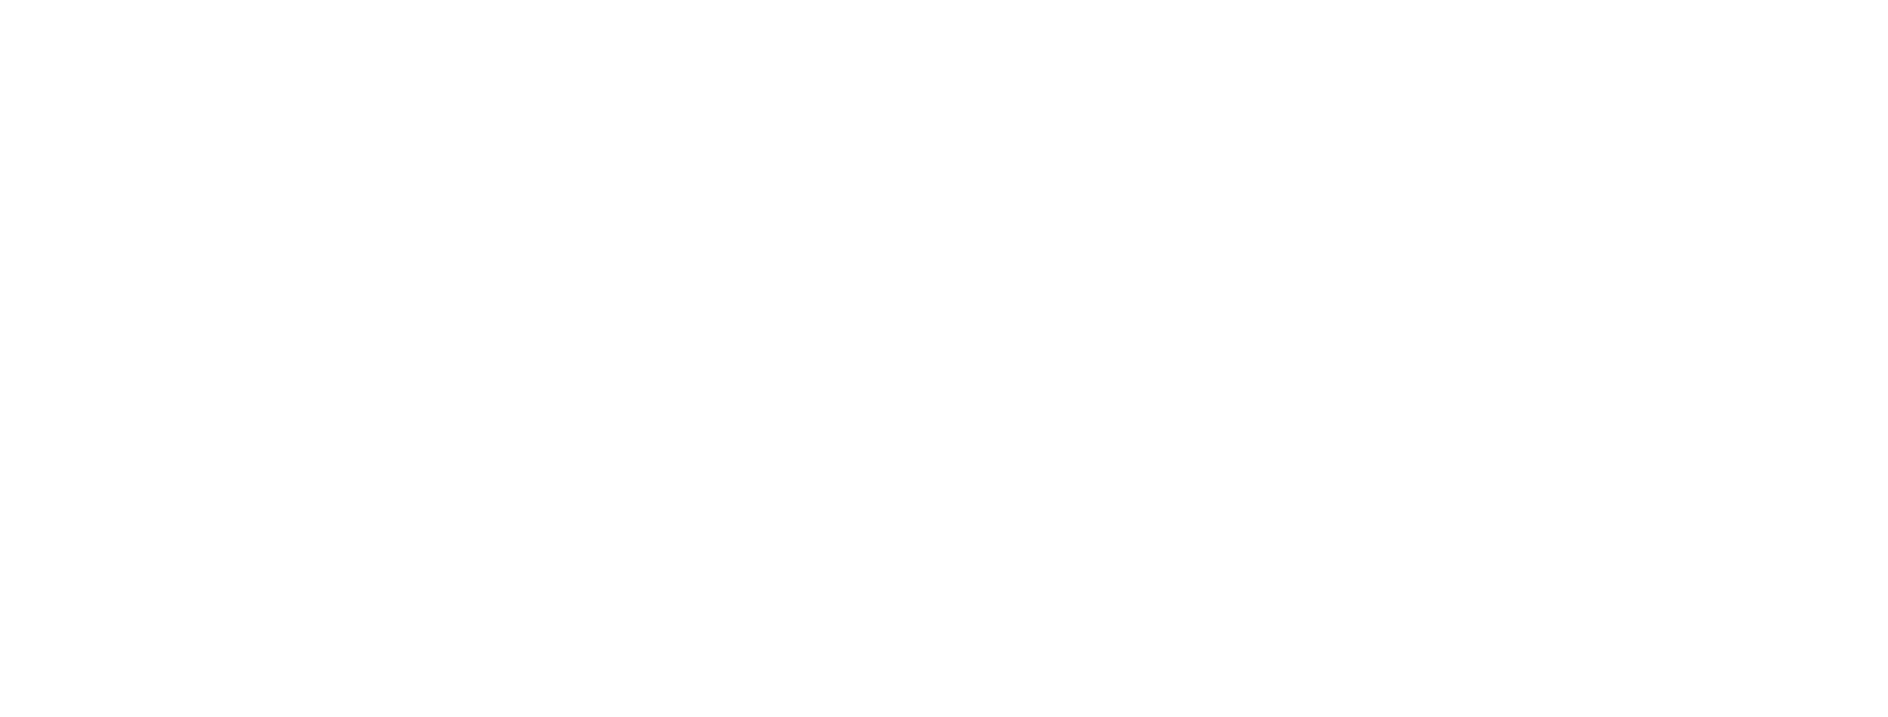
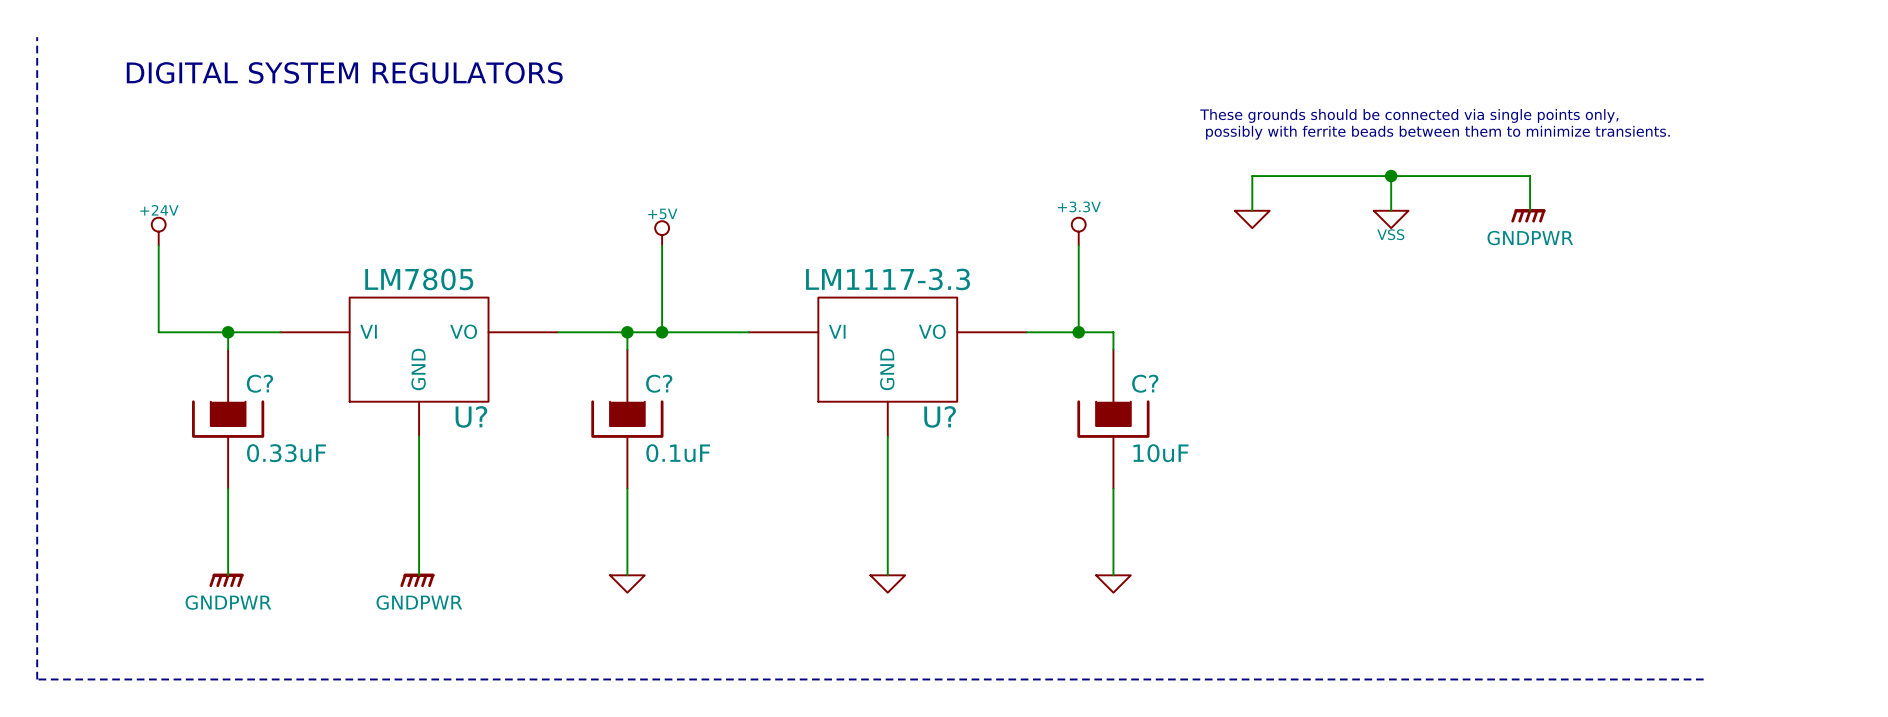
line: none -> (37, 37) (37, 679) (1703, 679)
text: none -> DIGITAL SYSTEM REGULATORS (344, 72)
text: none -> These grounds should be connected via single points only, (1409, 115)
text: none -> possibly with ferrite beads between them to minimize transients. (1437, 132)
wire: none -> (1391, 176) (1391, 210)
junction: none -> (1391, 176)
wire: none -> (1252, 210) (1252, 176) (1530, 176) (1530, 210)
power symbol: none -> GNDPWR (1528, 215)
power symbol: none -> (1252, 219)
power symbol: none -> VSS (1391, 219)
power symbol: none -> +24V (158, 231)
power symbol: none -> +3.3V (1078, 231)
power symbol: none -> +5V (662, 233)
wire: none -> (158, 245) (158, 332) (280, 332)
wire: none -> (662, 245) (662, 332)
wire: none -> (1078, 245) (1078, 332)
wire: none -> (228, 332) (228, 349)
junction: none -> (228, 332)
wire: none -> (557, 332) (748, 332)
wire: none -> (627, 332) (627, 349)
junction: none -> (627, 332)
junction: none -> (662, 332)
wire: none -> (1026, 332) (1113, 332) (1113, 349)
junction: none -> (1078, 332)
U?: none -> LM7805 (419, 367)
U?: none -> LM1117-3.3 (887, 367)
C?: none -> 0.33uF (228, 419)
C?: none -> 0.1uF (627, 419)
C?: none -> 10uF (1113, 419)
wire: none -> (419, 436) (419, 575)
wire: none -> (887, 436) (887, 575)
wire: none -> (228, 488) (228, 575)
wire: none -> (627, 488) (627, 575)
wire: none -> (1113, 488) (1113, 575)
power symbol: none -> GNDPWR (226, 580)
power symbol: none -> GNDPWR (417, 580)
power symbol: none -> (627, 583)
power symbol: none -> (887, 583)
power symbol: none -> (1113, 583)

